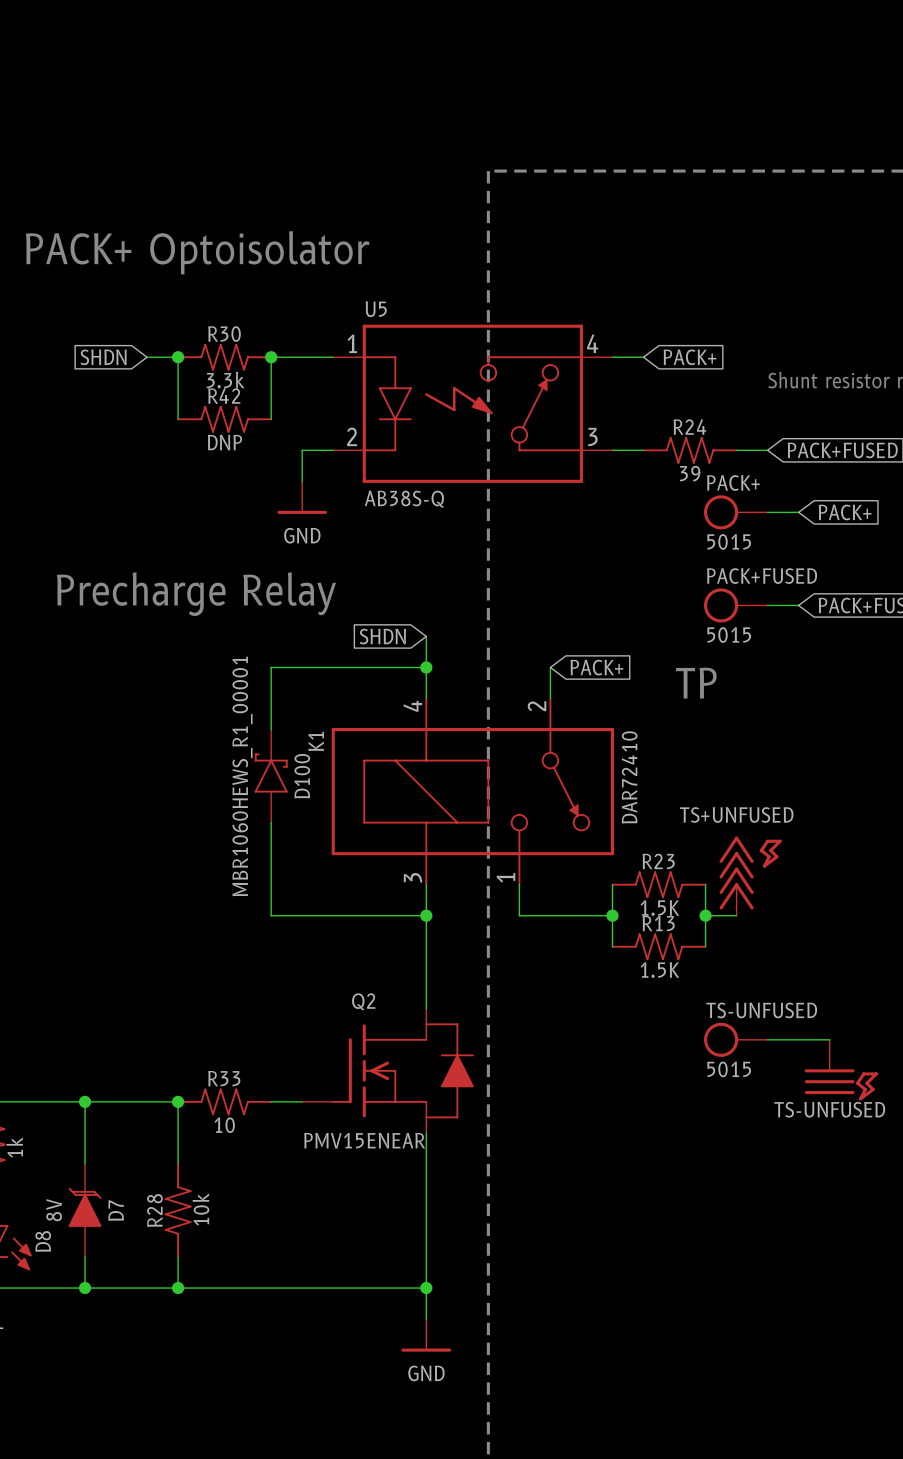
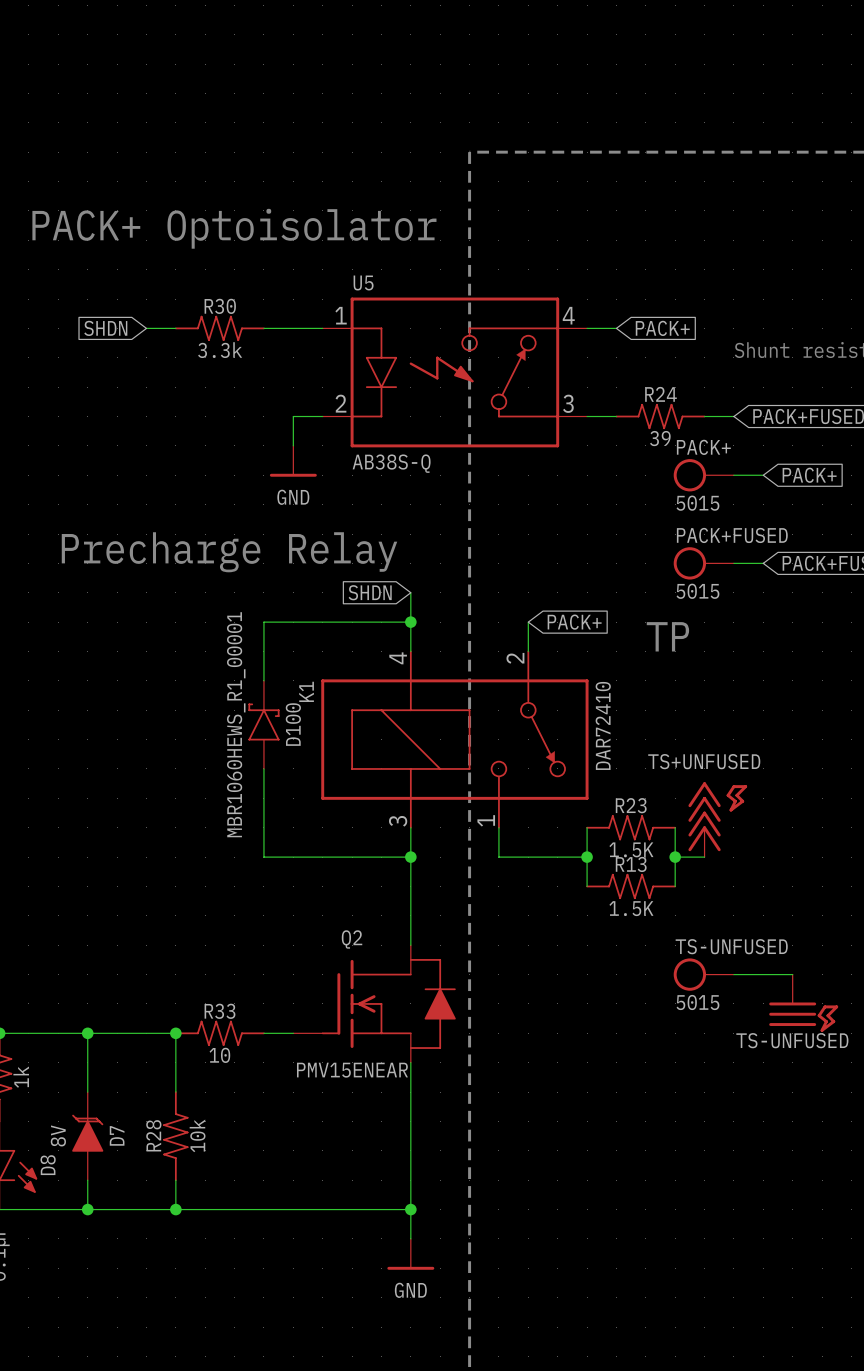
wire: (178, 357) (178, 419) -> none
junction: (178, 357) -> none
wire: (271, 357) (271, 419) -> none
junction: (271, 357) -> none
R42: (224, 419) -> none

